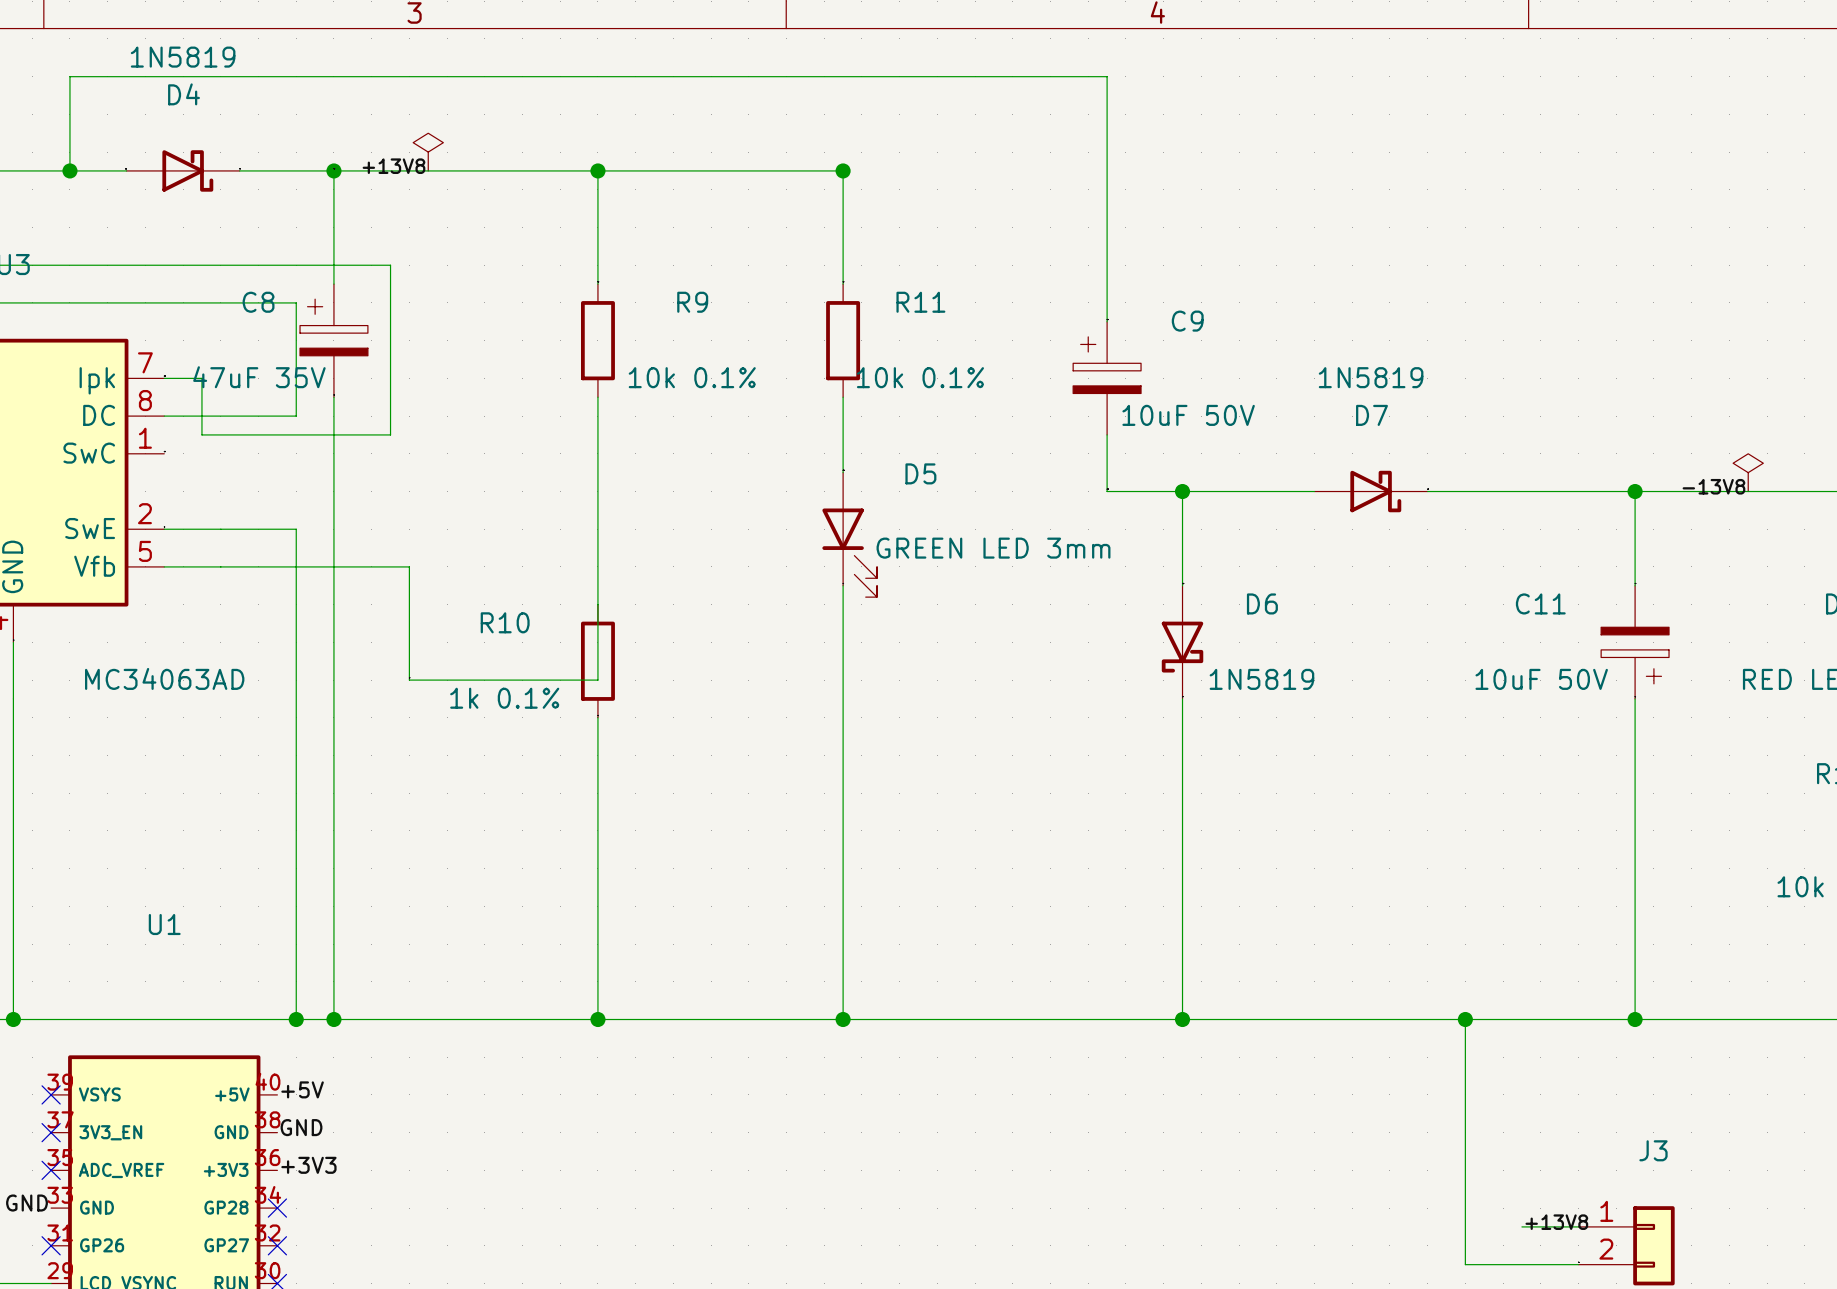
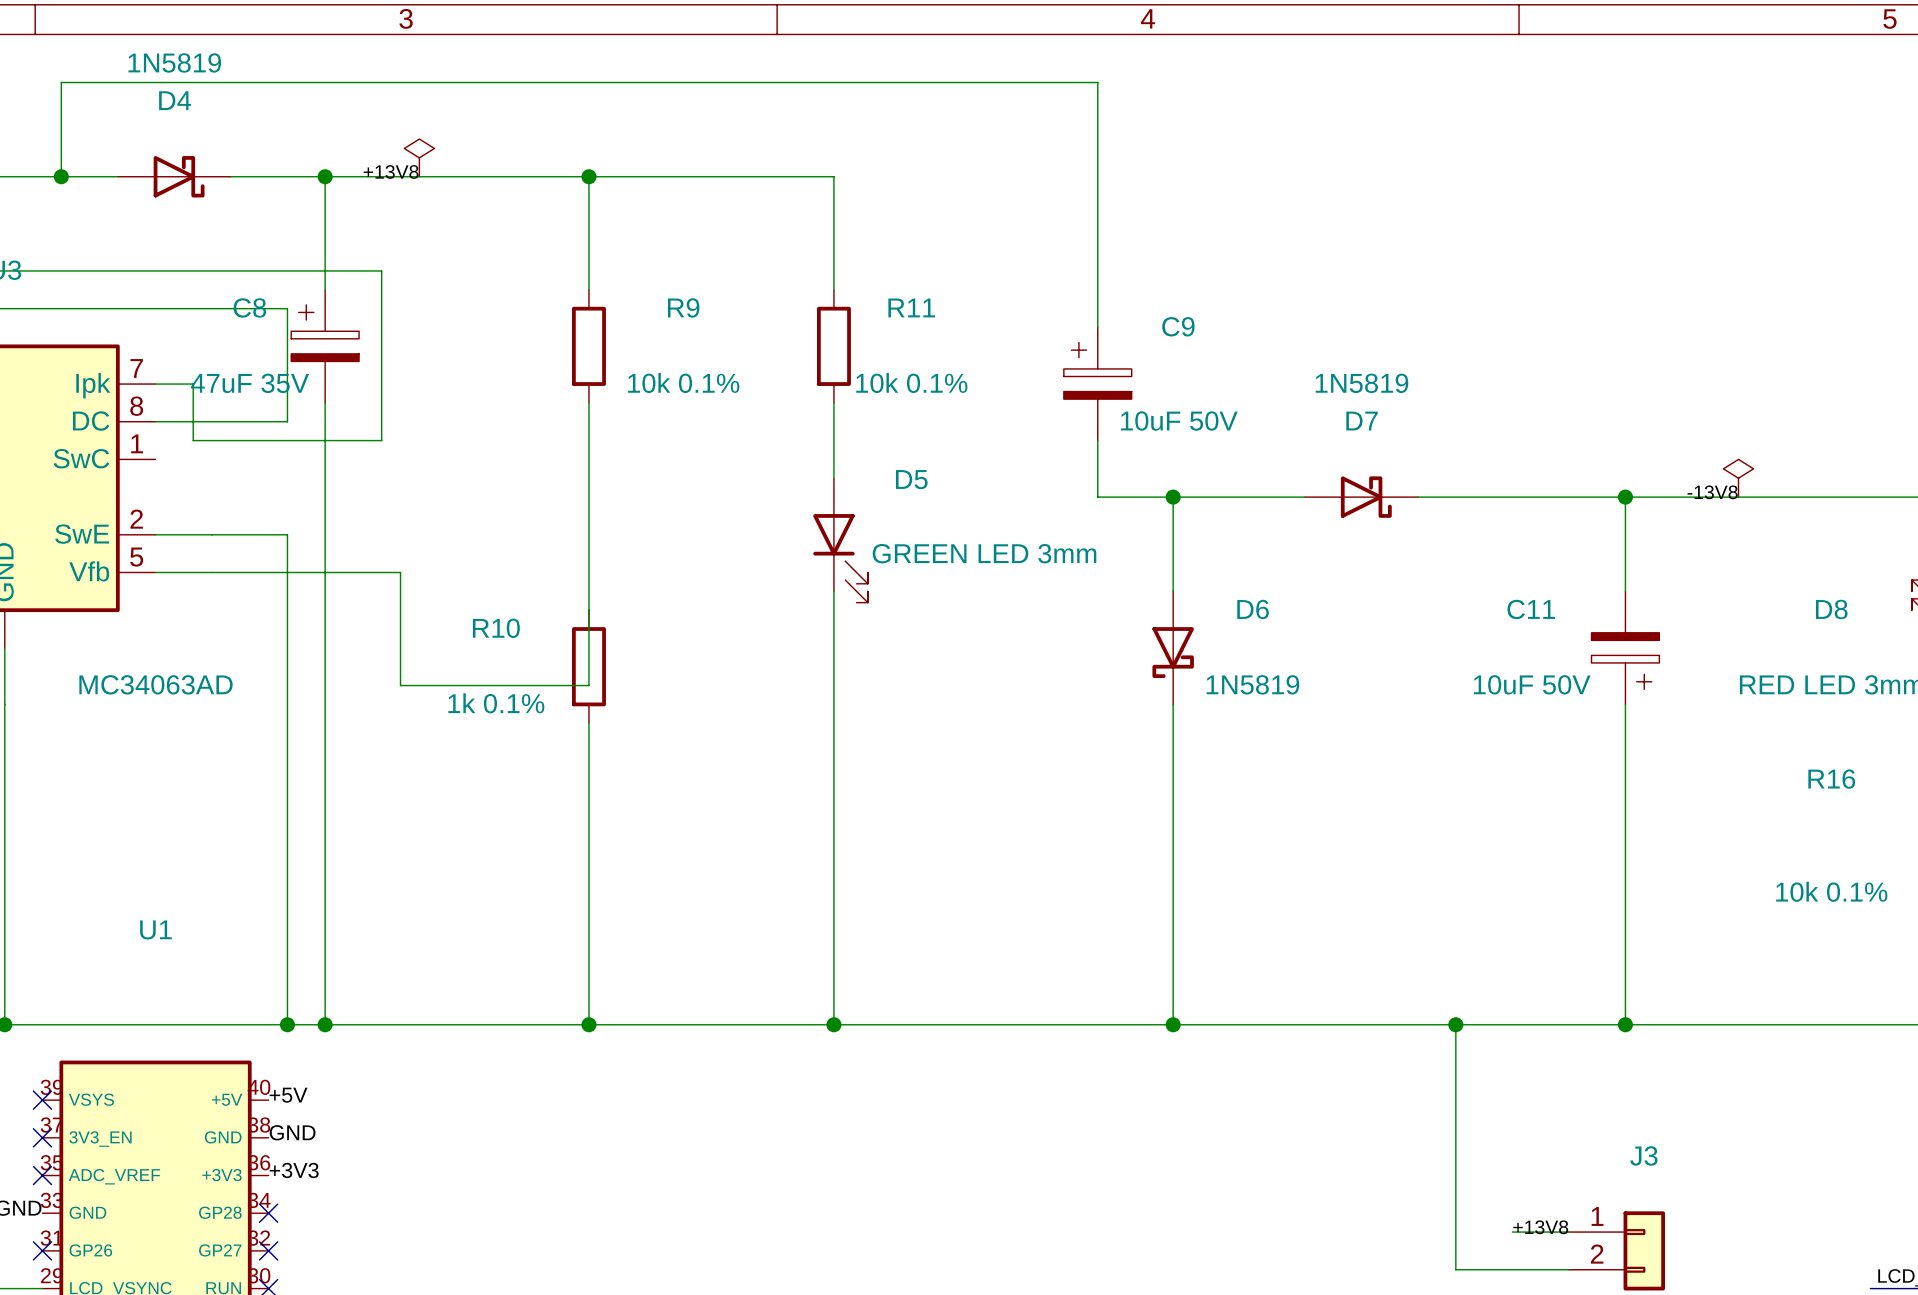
junction: (843, 170) -> none

